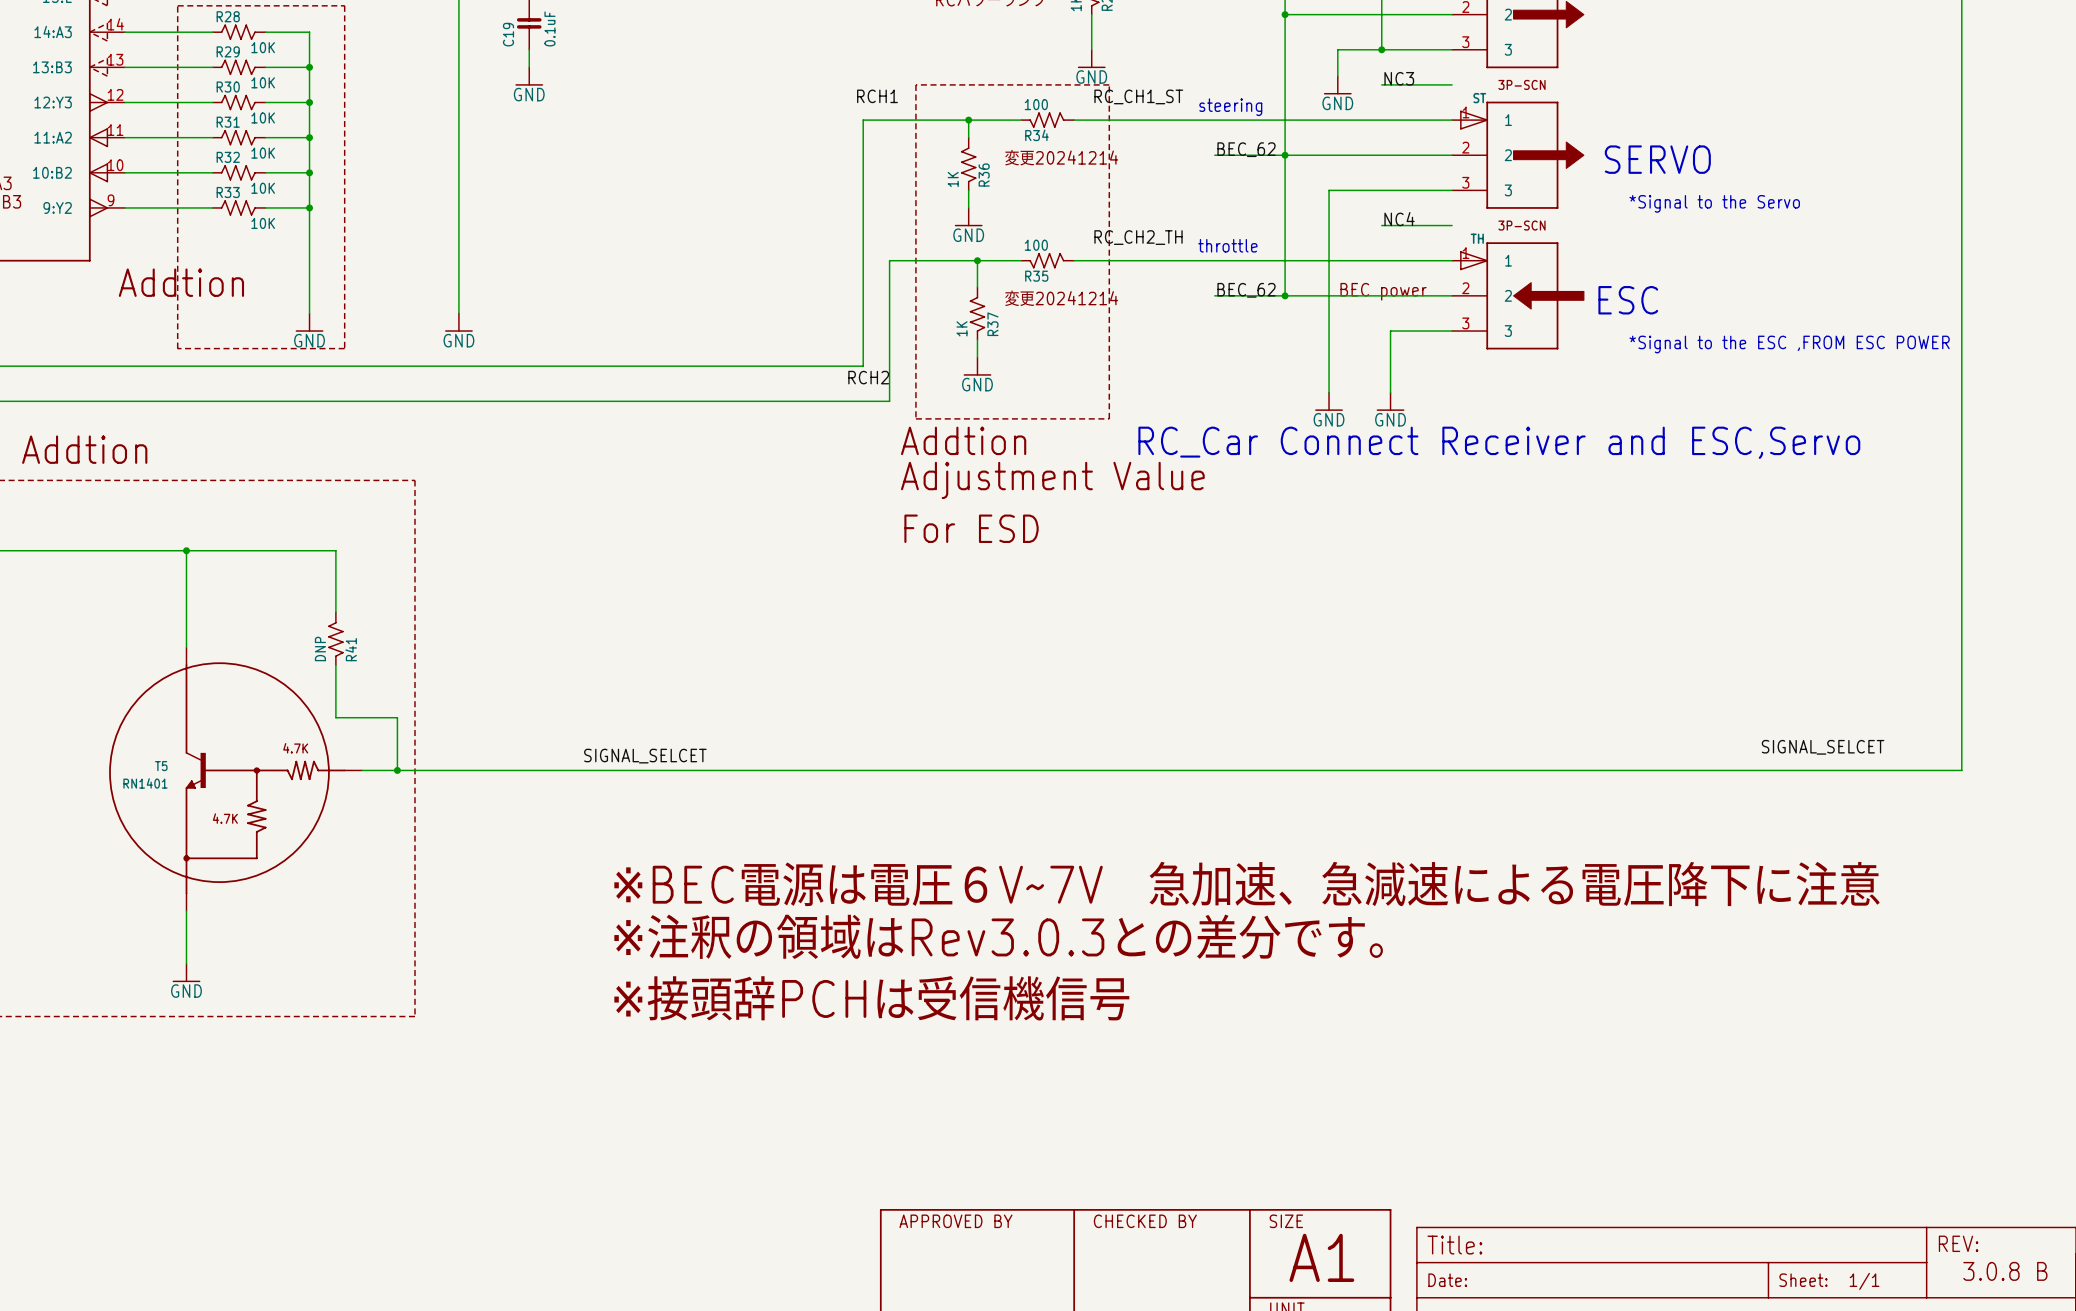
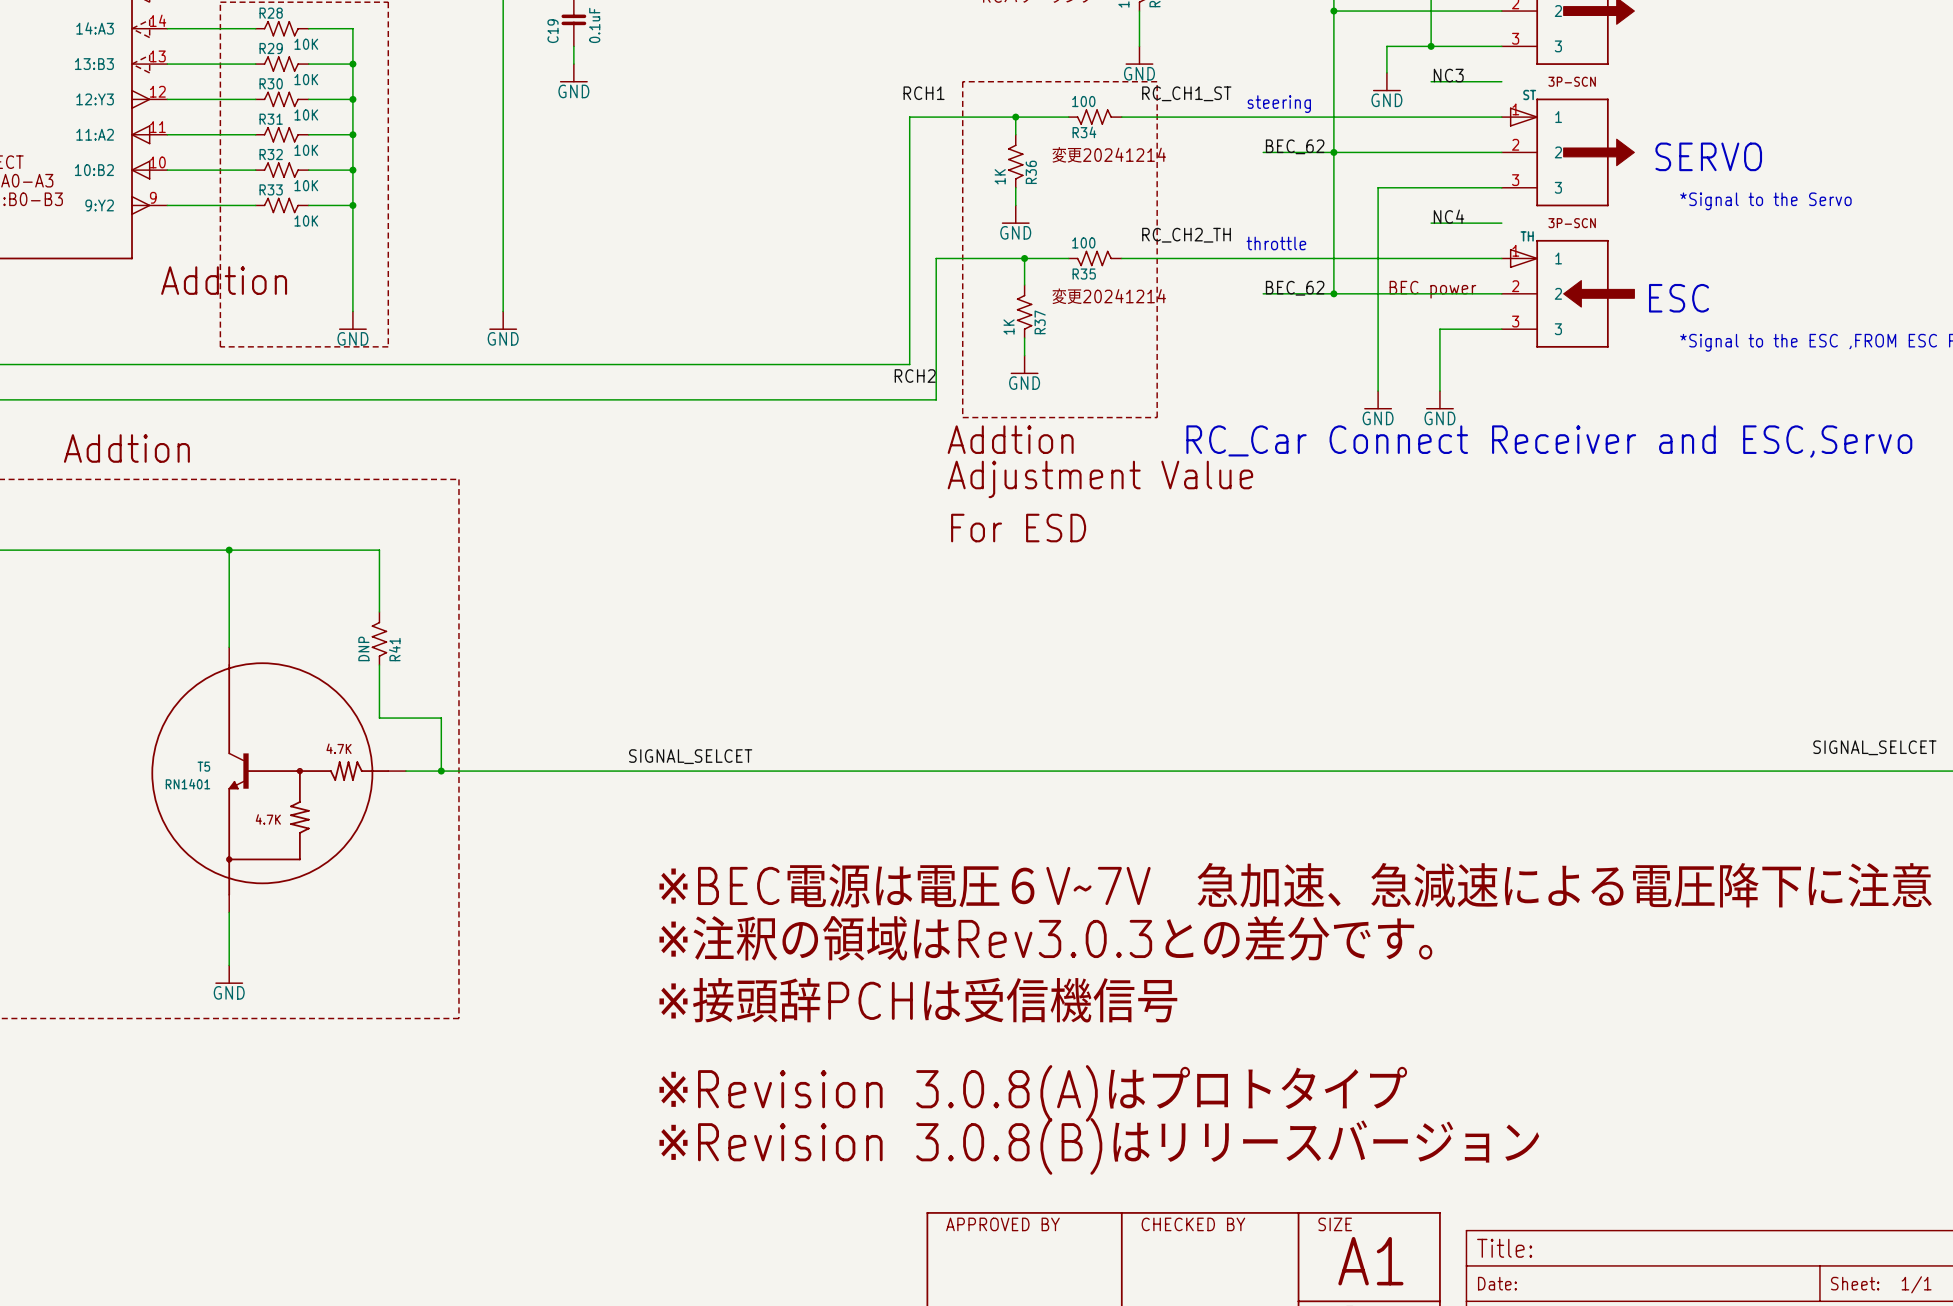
text: none -> ※Revision 3.0.8(A)はプロトタイプ (1033, 1093)
text: none -> ※Revision 3.0.8(B)はリリースバージョン (1099, 1146)

